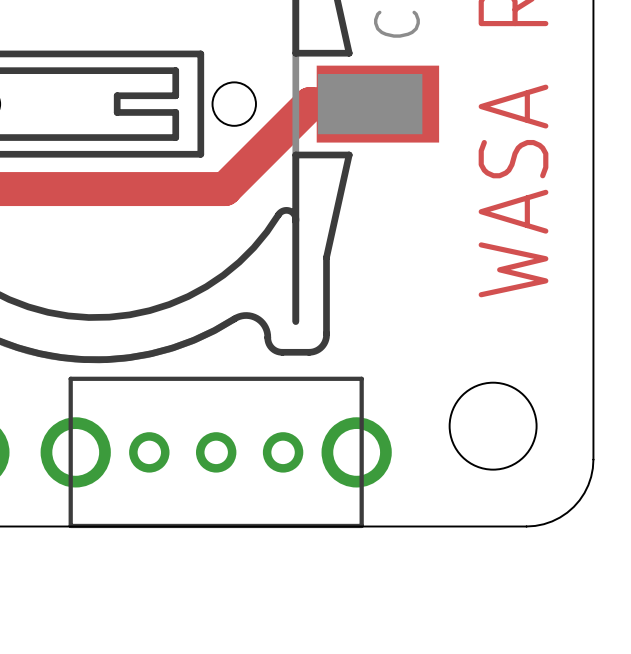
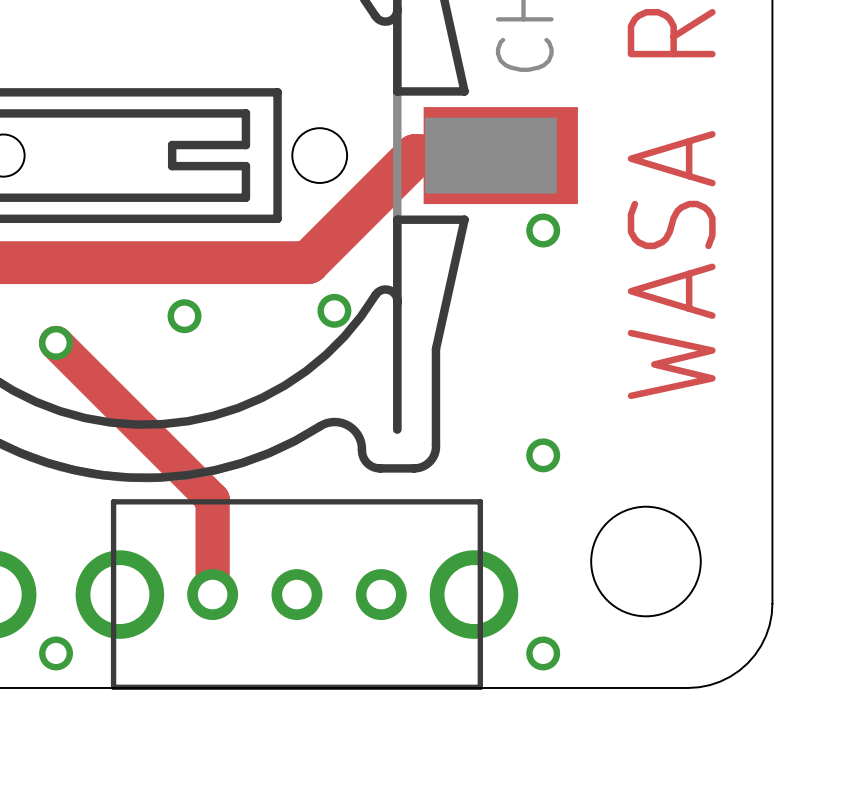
via: none -> (543, 230)
via: none -> (334, 310)
via: none -> (184, 316)
track: none -> (56, 342) (212, 499) (212, 594)
via: none -> (56, 342)
via: none -> (543, 455)
via: none -> (56, 653)
via: none -> (543, 653)

